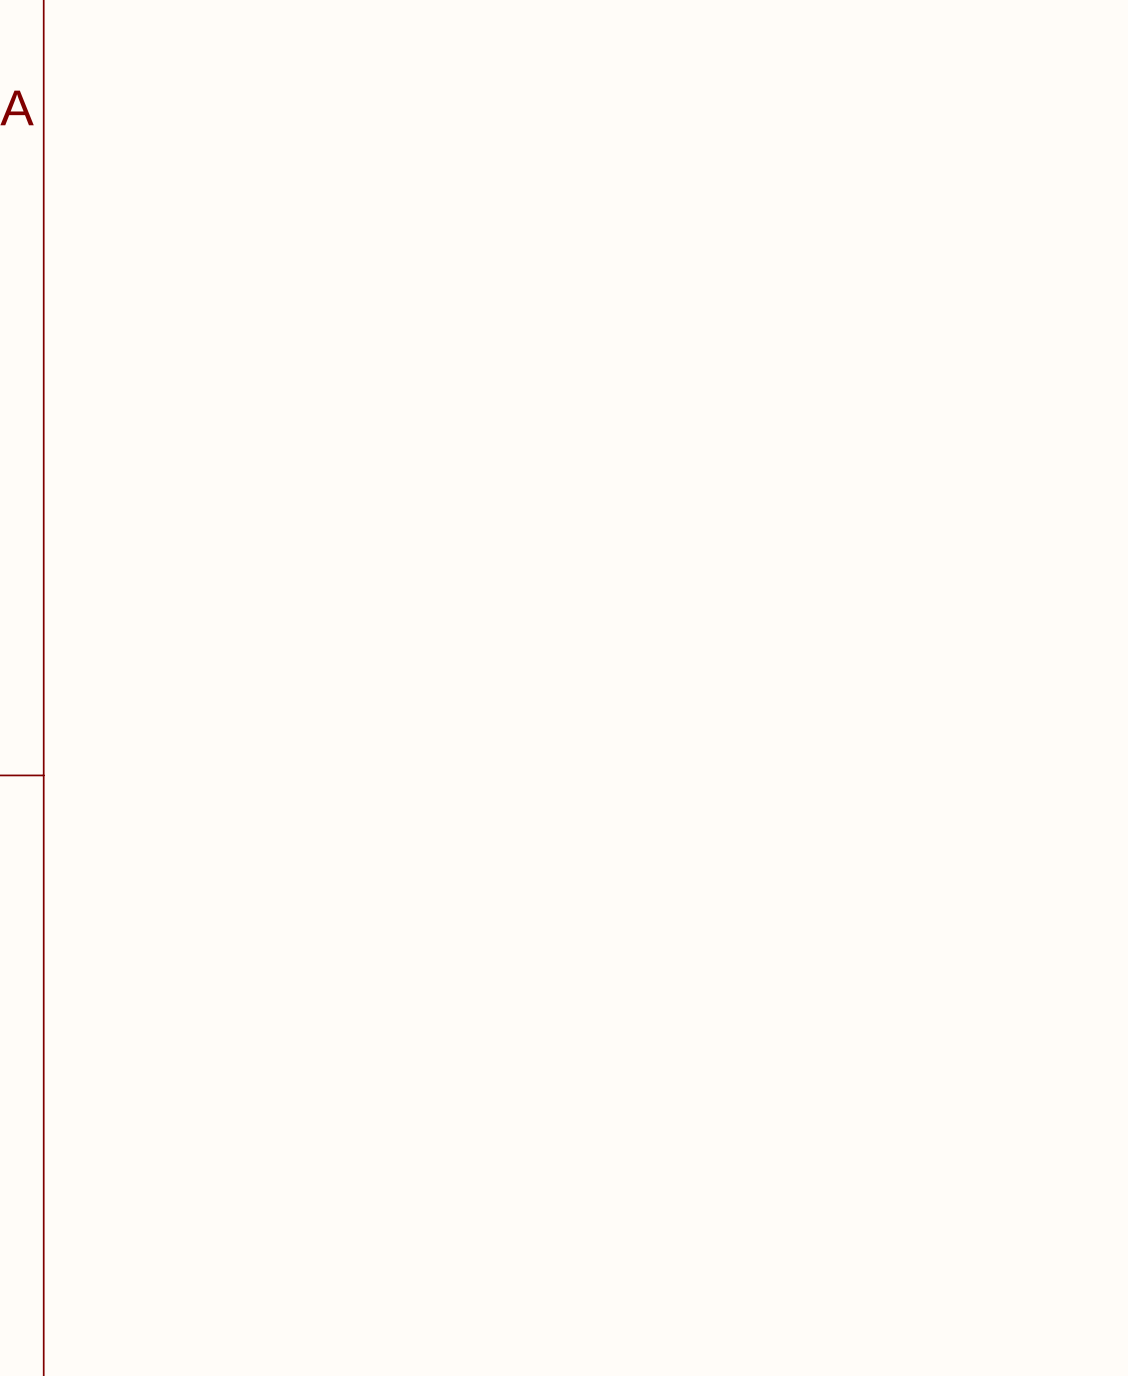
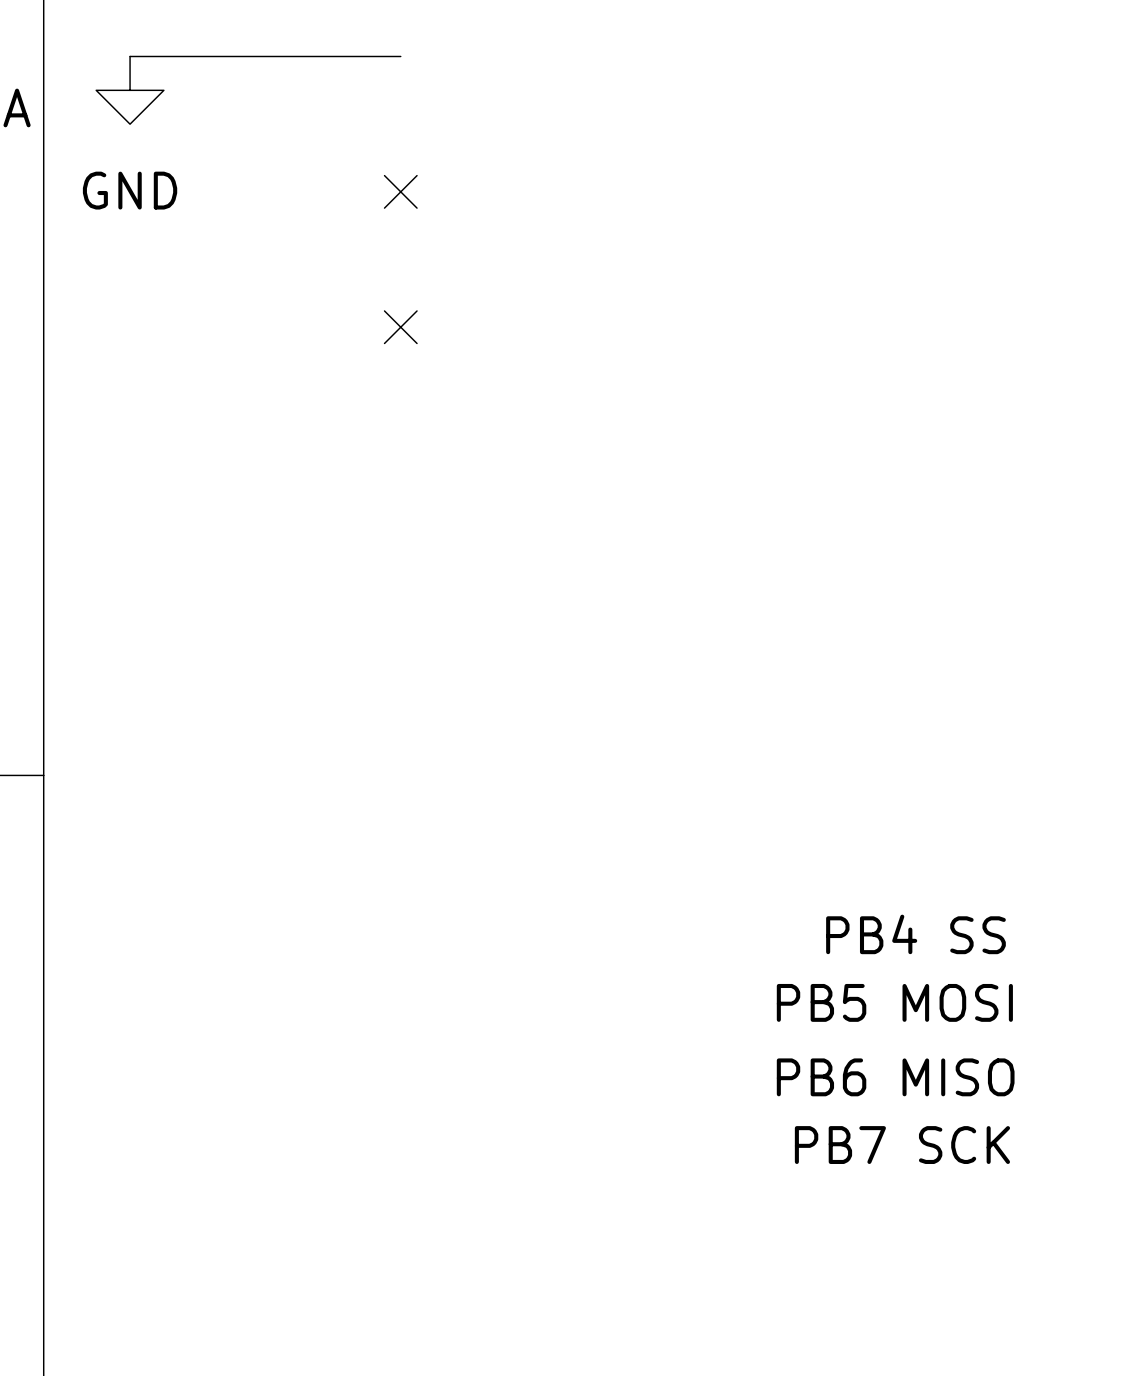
wire: none -> (130, 56) (400, 56)
power symbol: none -> GND (130, 90)
no-connect mark: none -> (400, 191)
no-connect mark: none -> (400, 327)
text: none -> PB4 SS (915, 934)
text: none -> PB5 MOSI (894, 1002)
text: none -> PB6 MISO (895, 1077)
text: none -> PB7 SCK (902, 1145)

